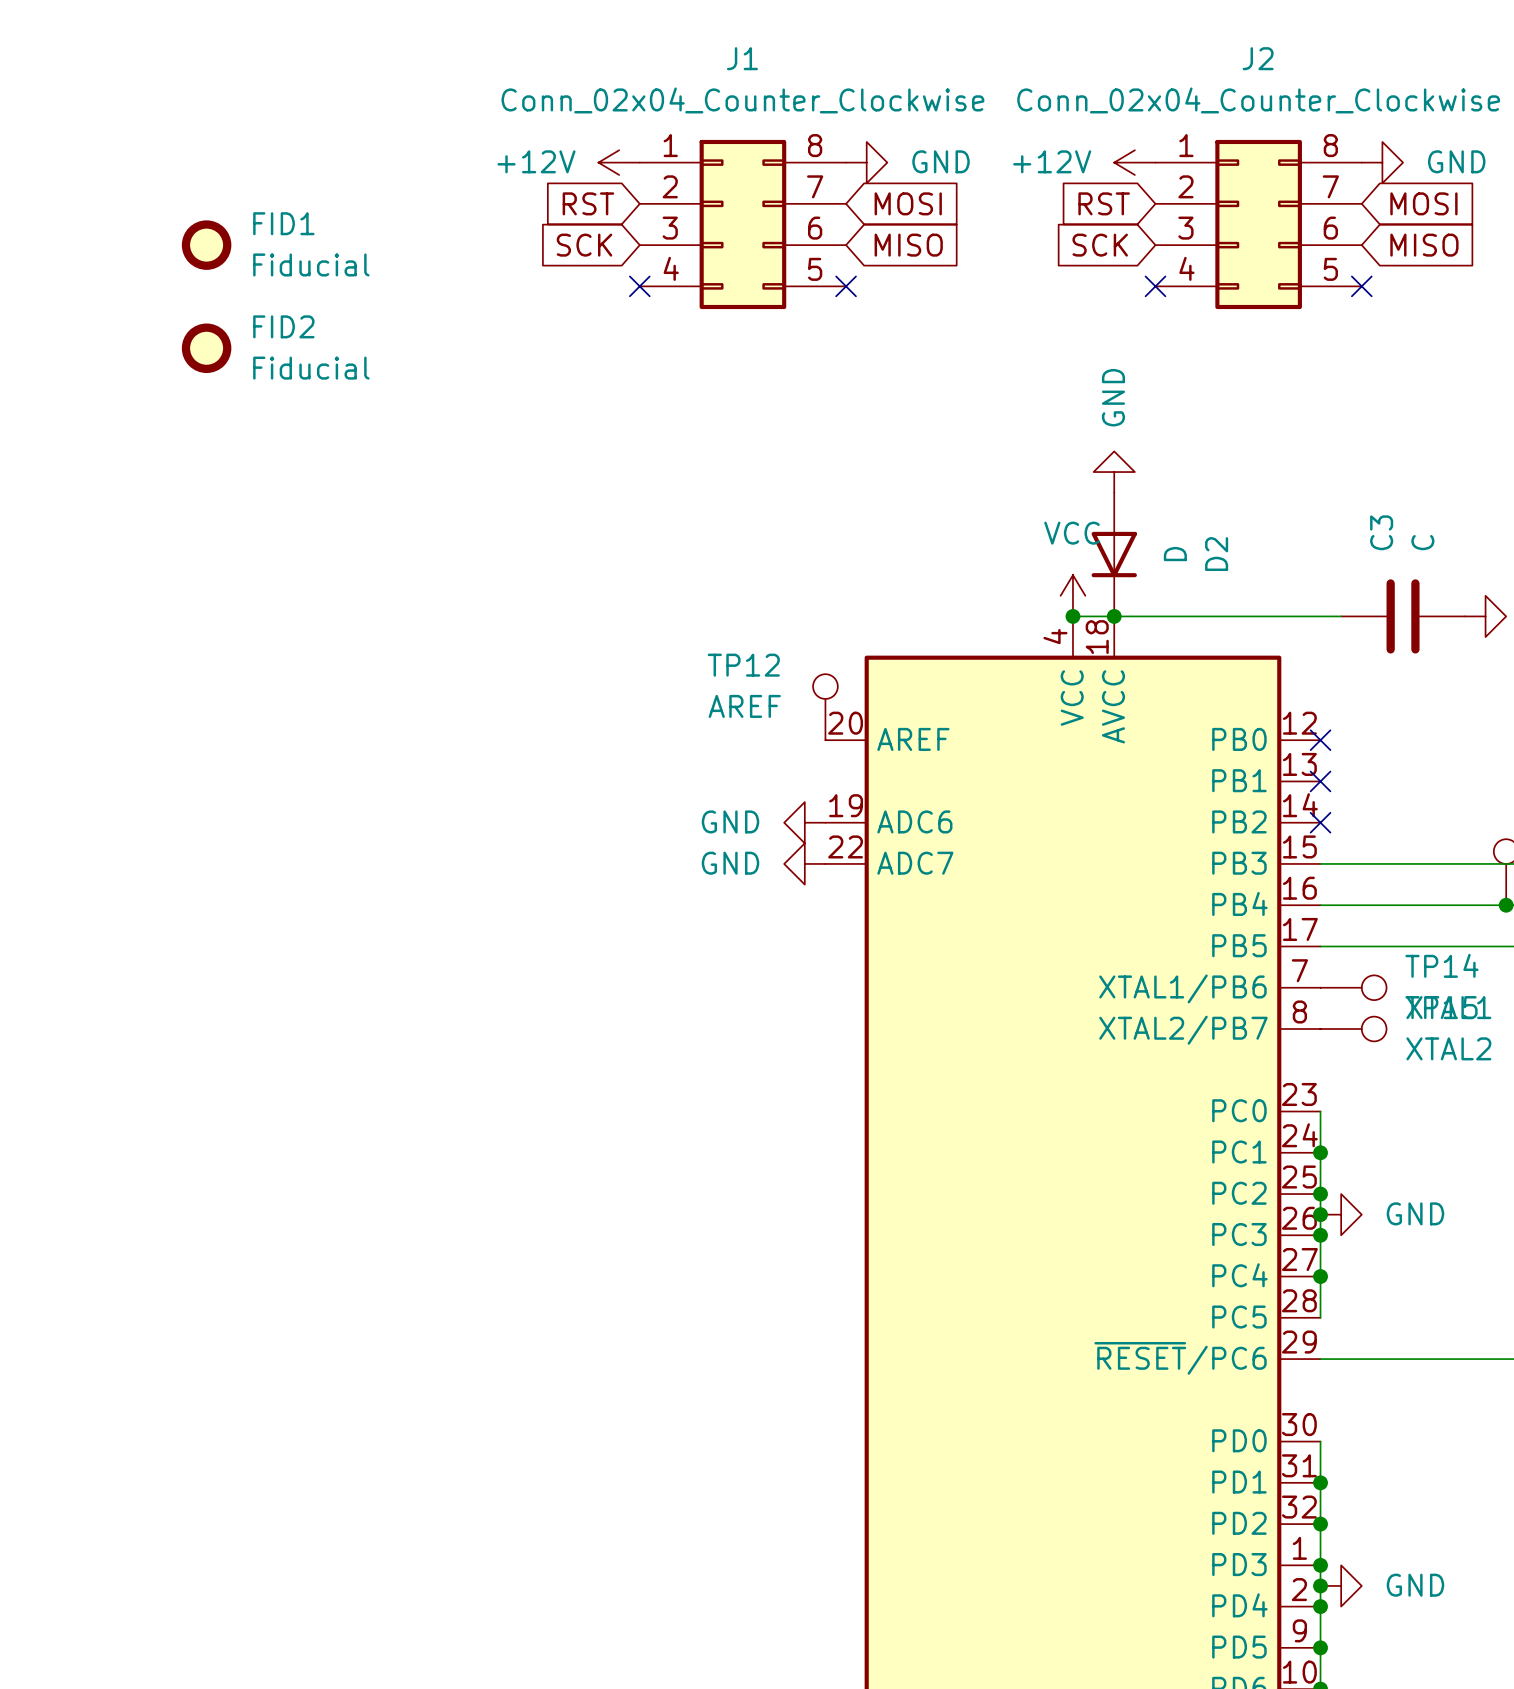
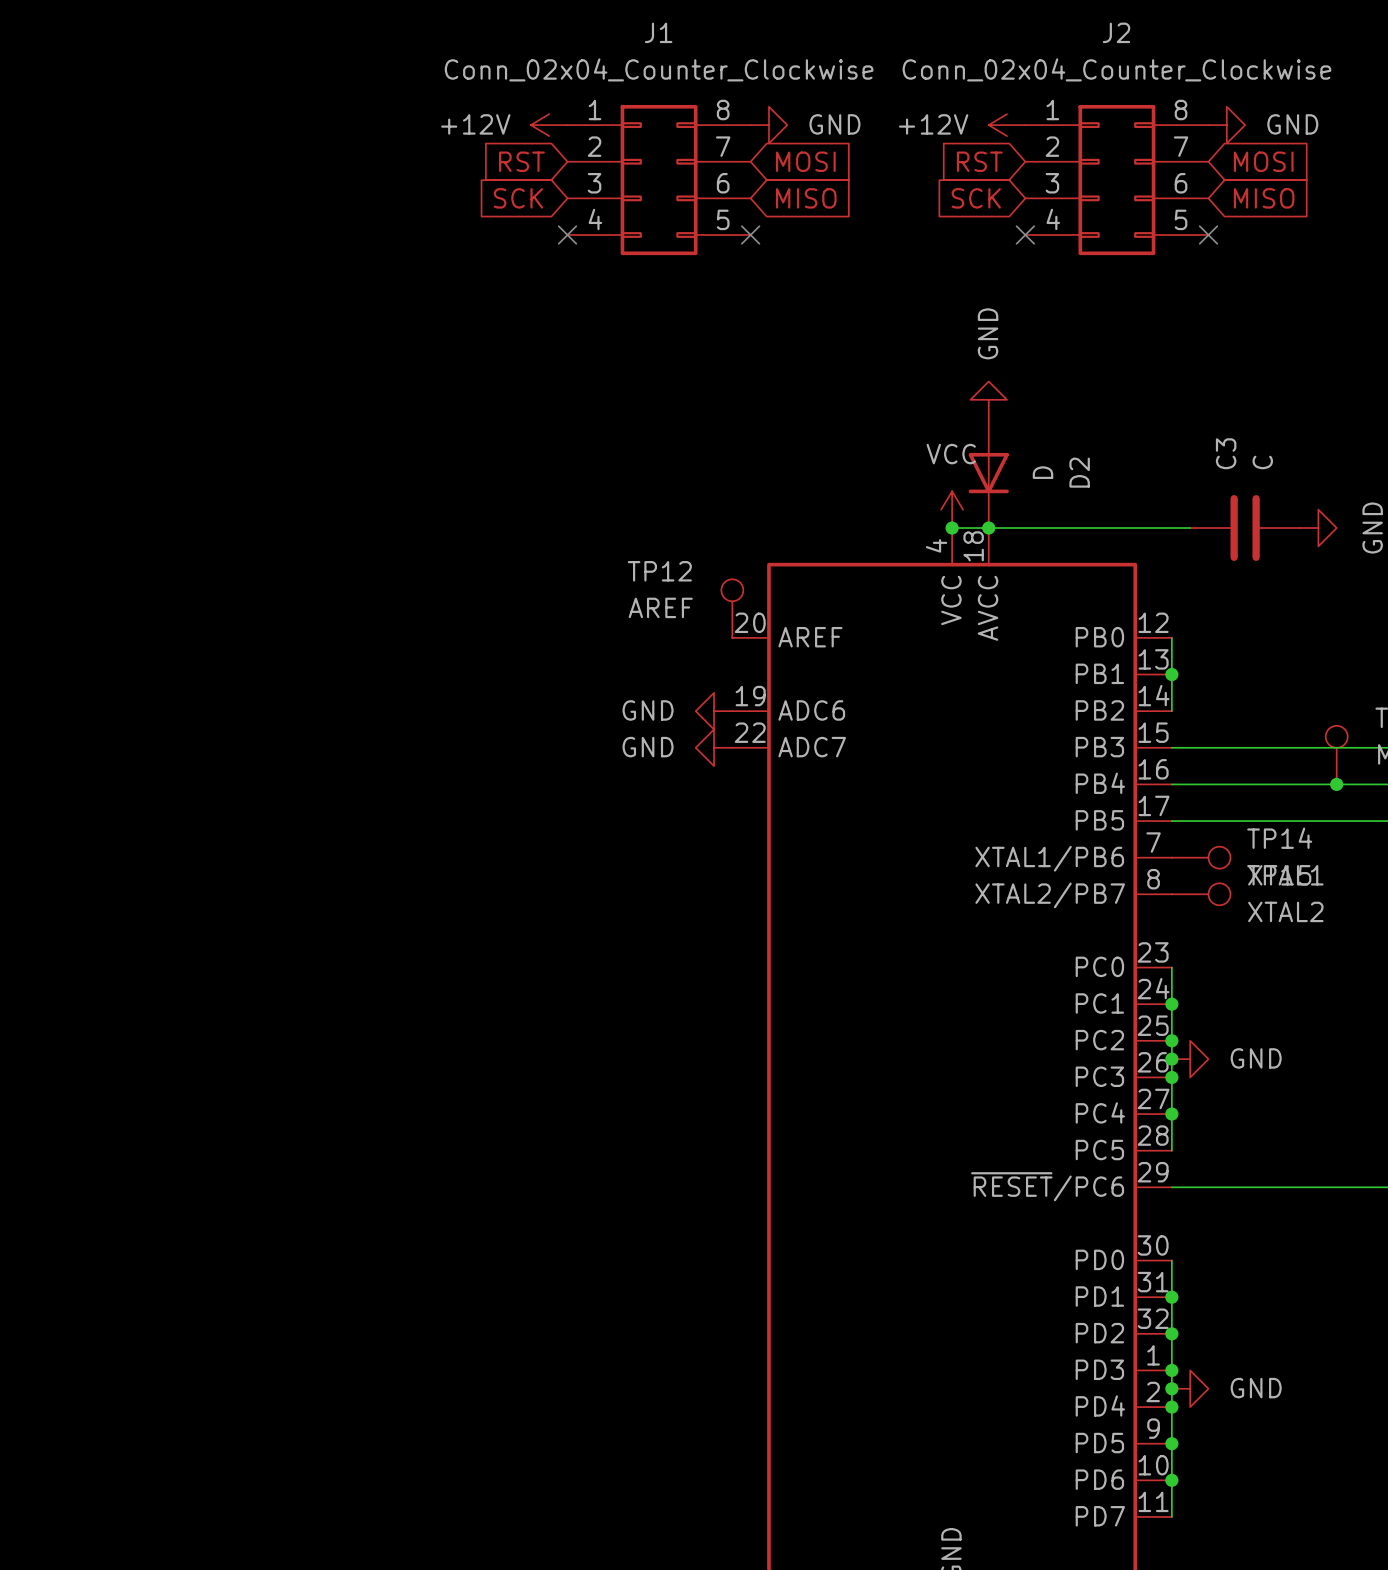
FID1: Fiducial (206, 245) -> none
FID2: Fiducial (206, 348) -> none
wire: none -> (1171, 637) (1171, 711)
no-connect mark: (1320, 740) -> none
no-connect mark: (1320, 781) -> none
junction: none -> (1171, 674)
no-connect mark: (1320, 822) -> none

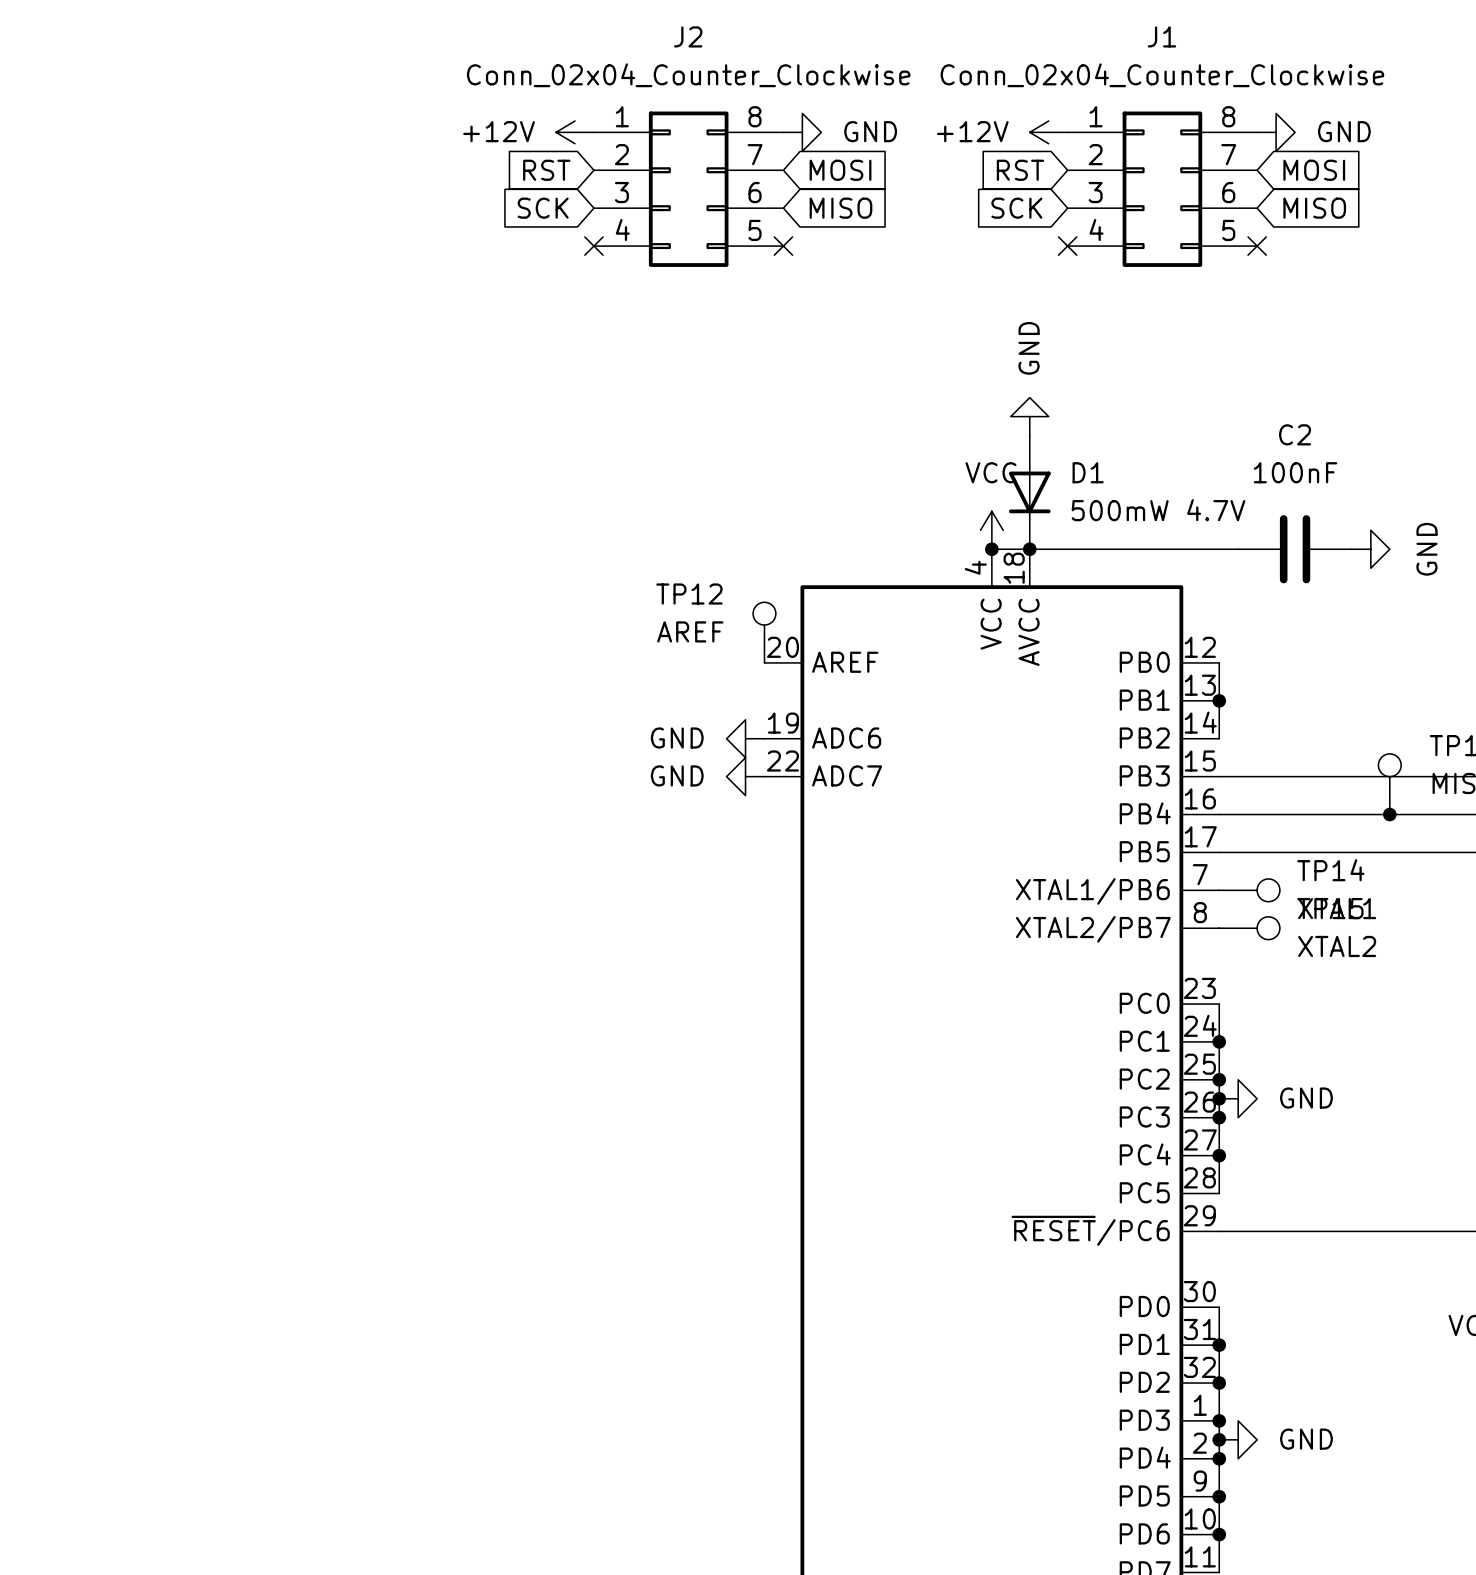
J1 name: J1 (658, 32) -> J2 (688, 36)
J2 name: J2 (1116, 32) -> J1 (1161, 36)
C3 name: C3 (1226, 453) -> C2 (1295, 434)
C3 value: C (1262, 462) -> 100nF (1295, 472)
D2 value: D (1042, 472) -> 500mW 4.7V (1158, 510)
D2 name: D2 (1079, 472) -> D1 (1088, 472)

